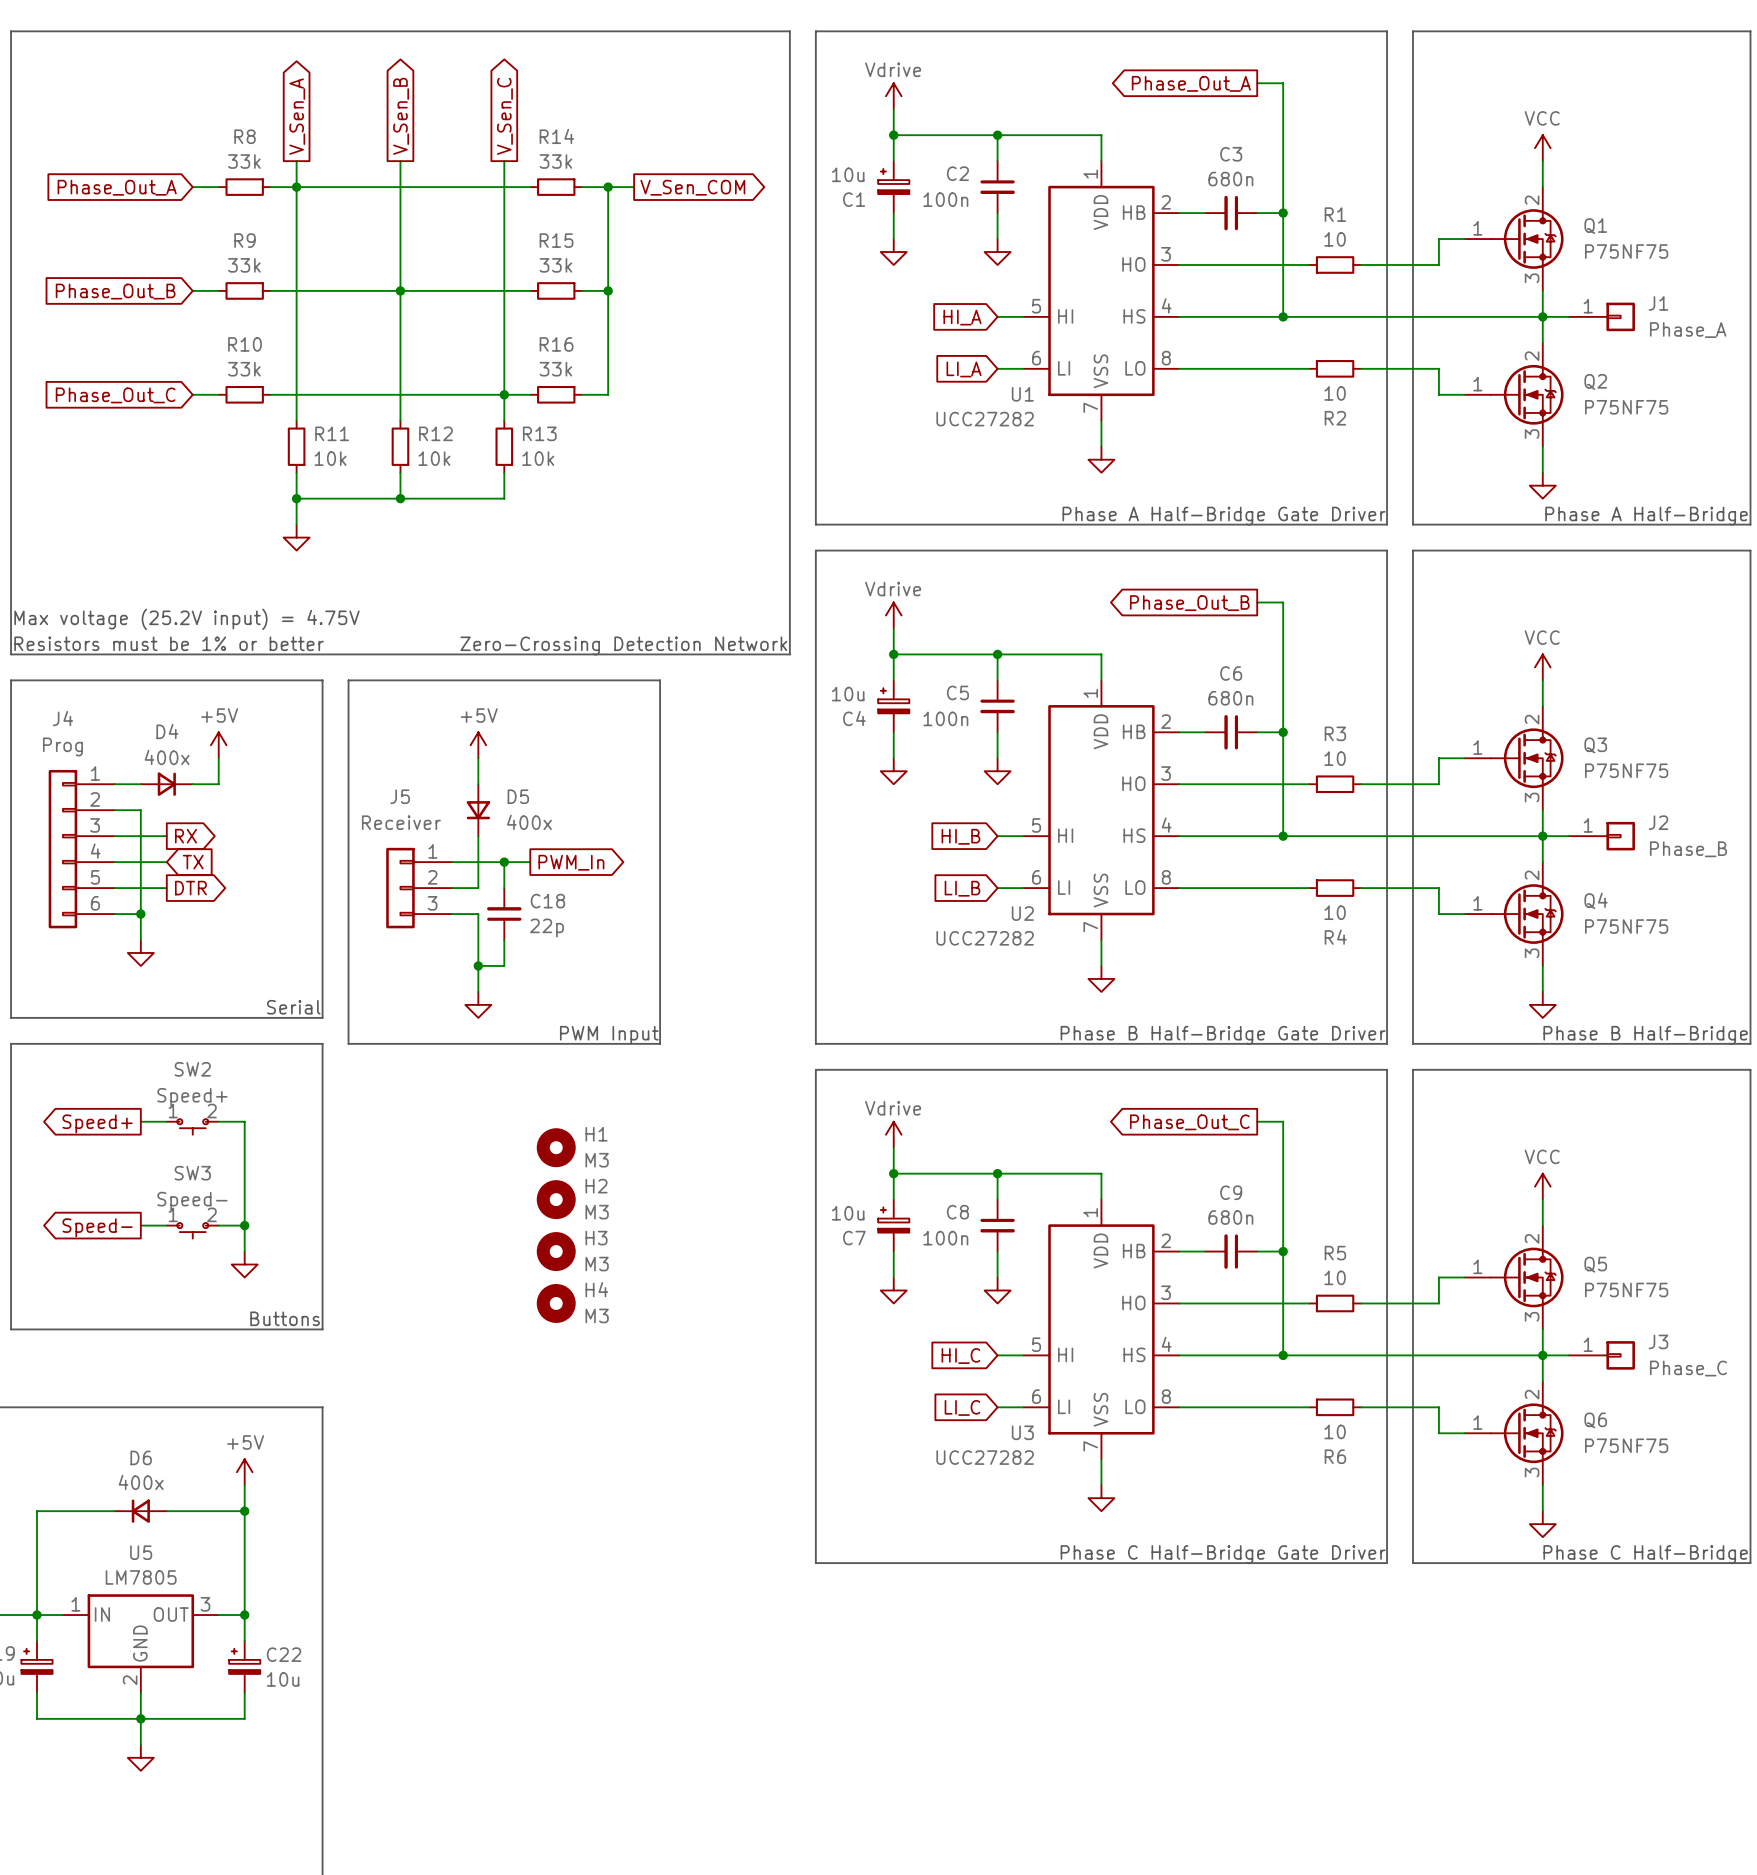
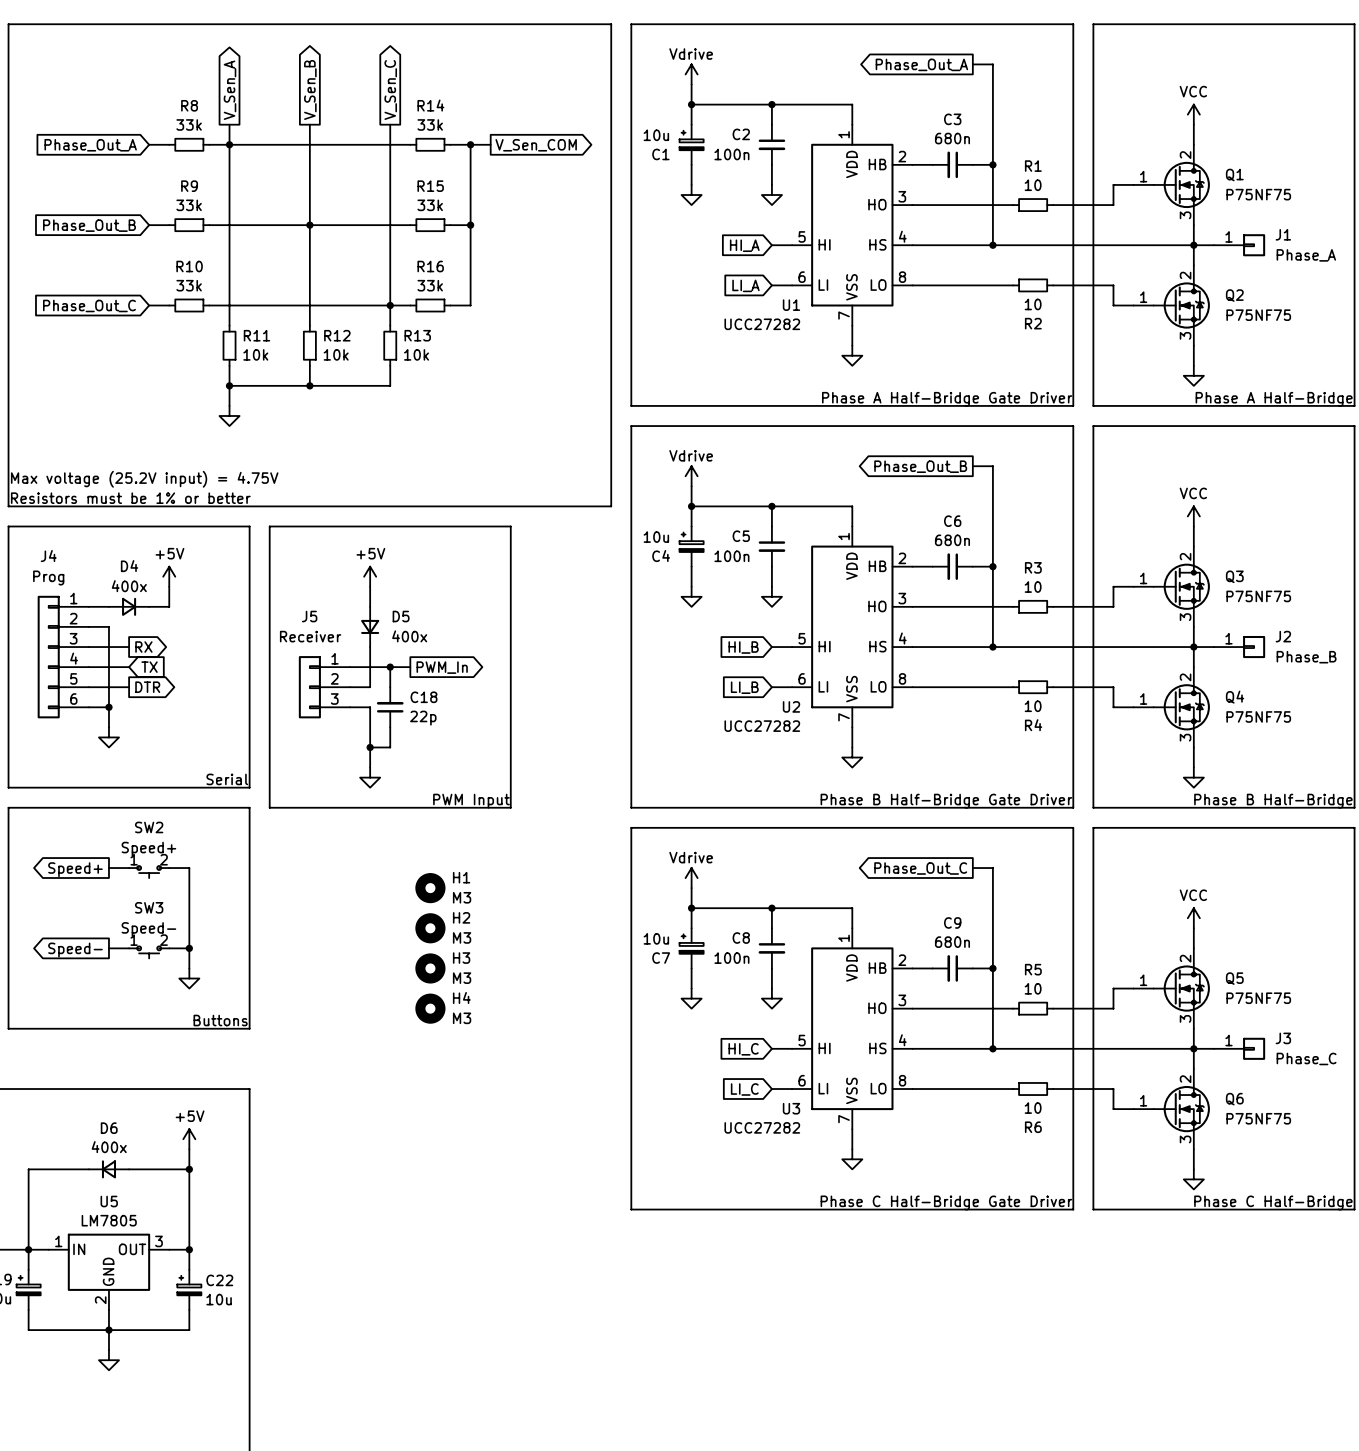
text: Zero-Crossing Detection Network (623, 645) -> none

